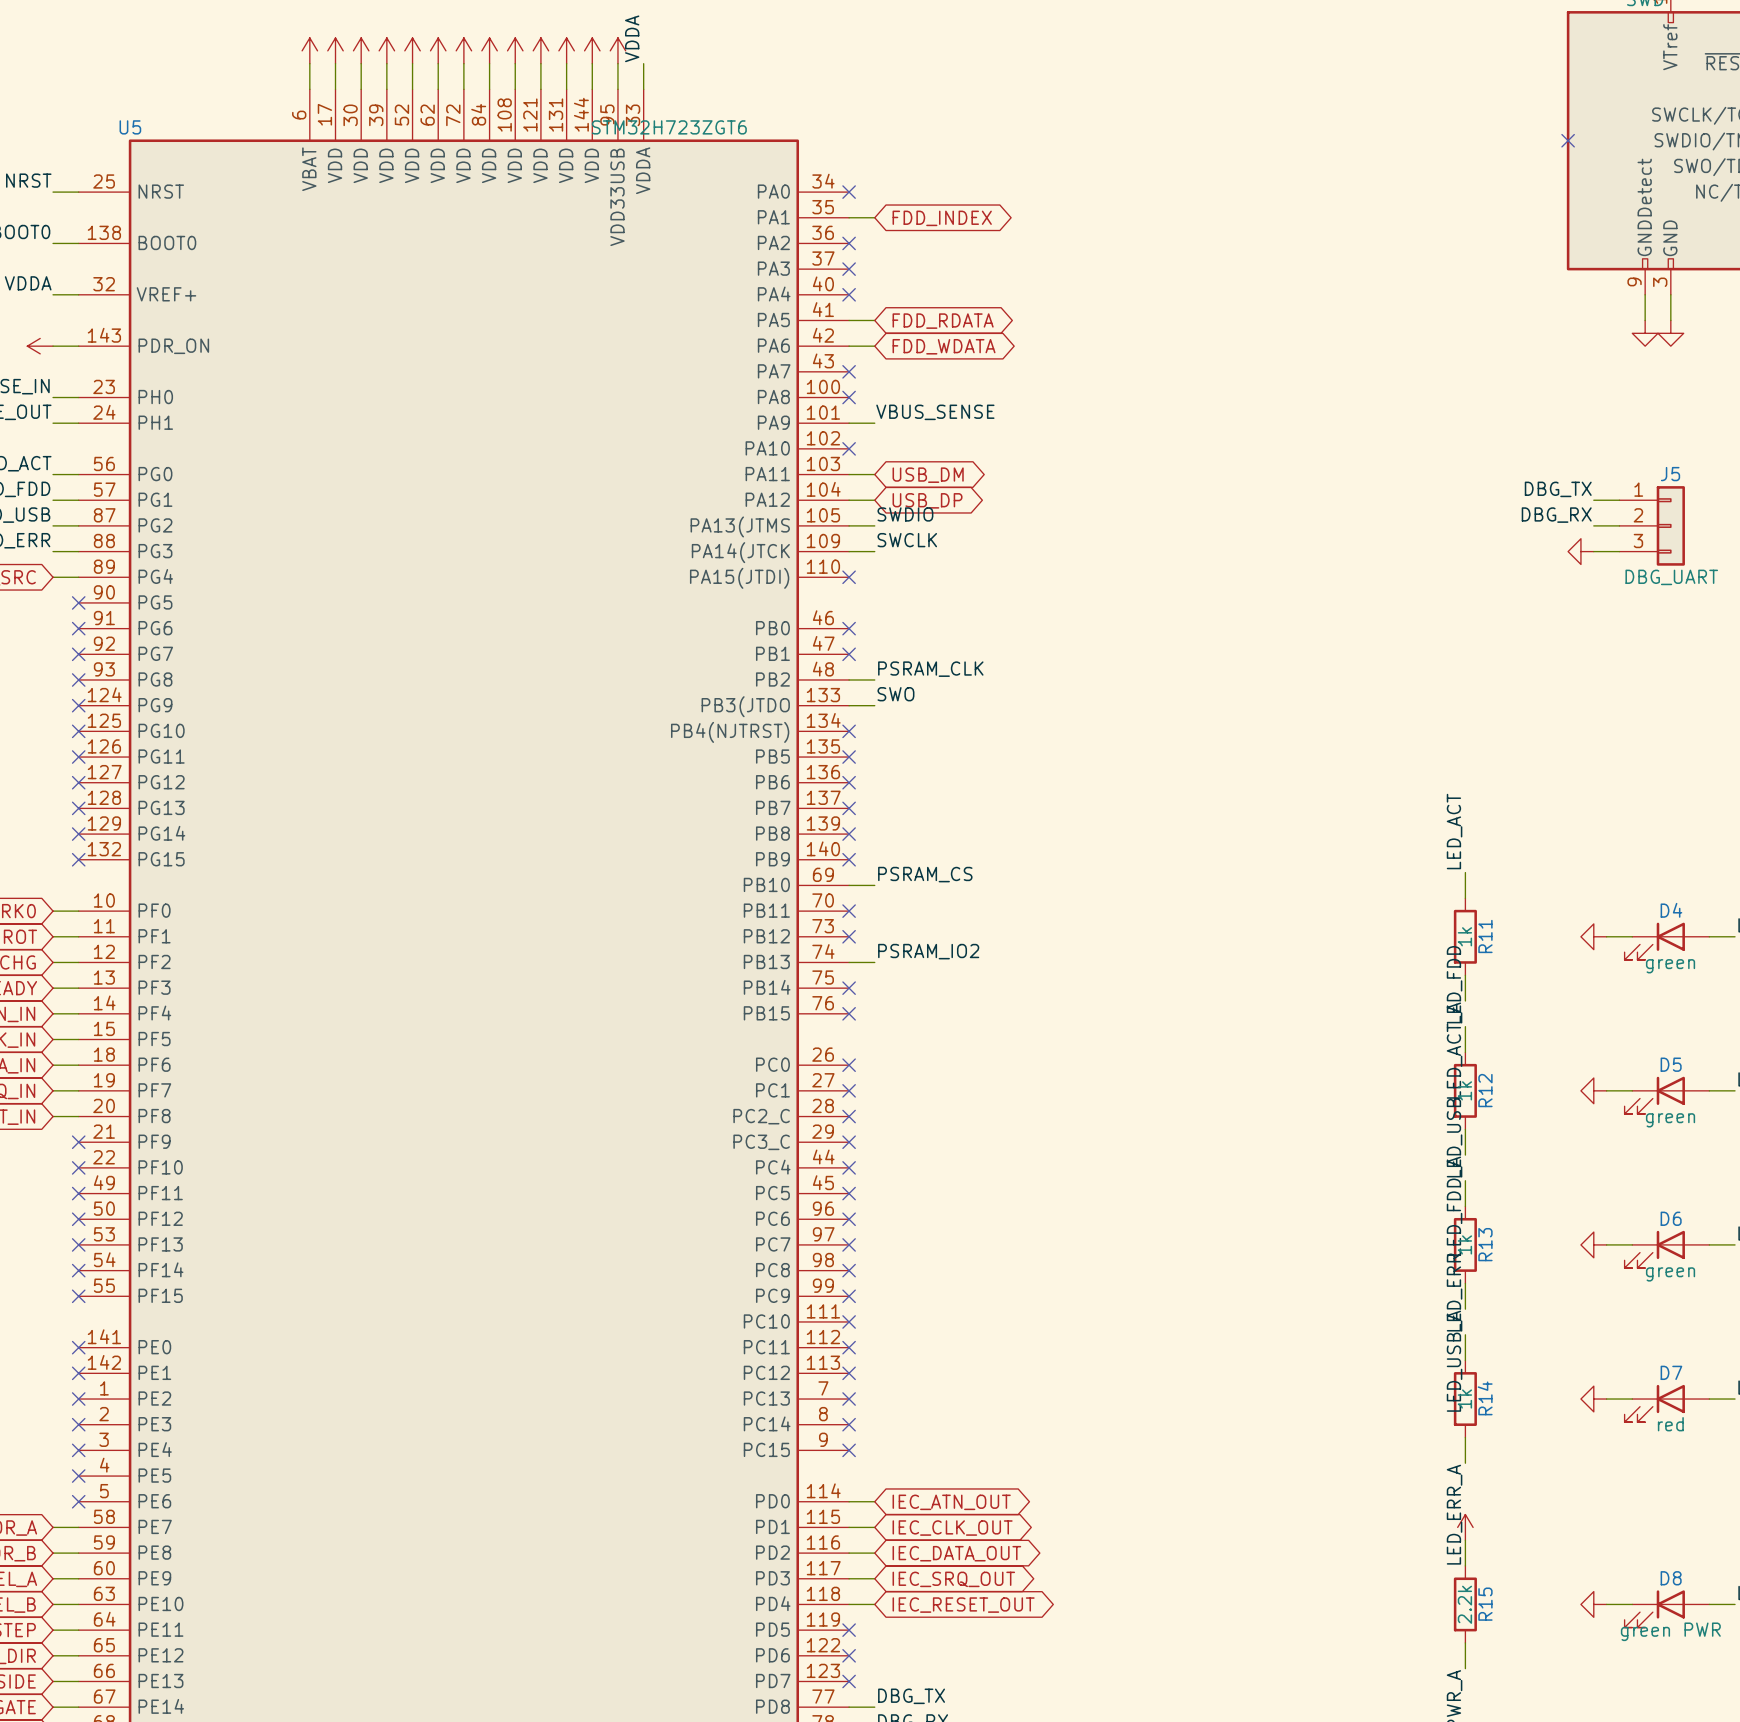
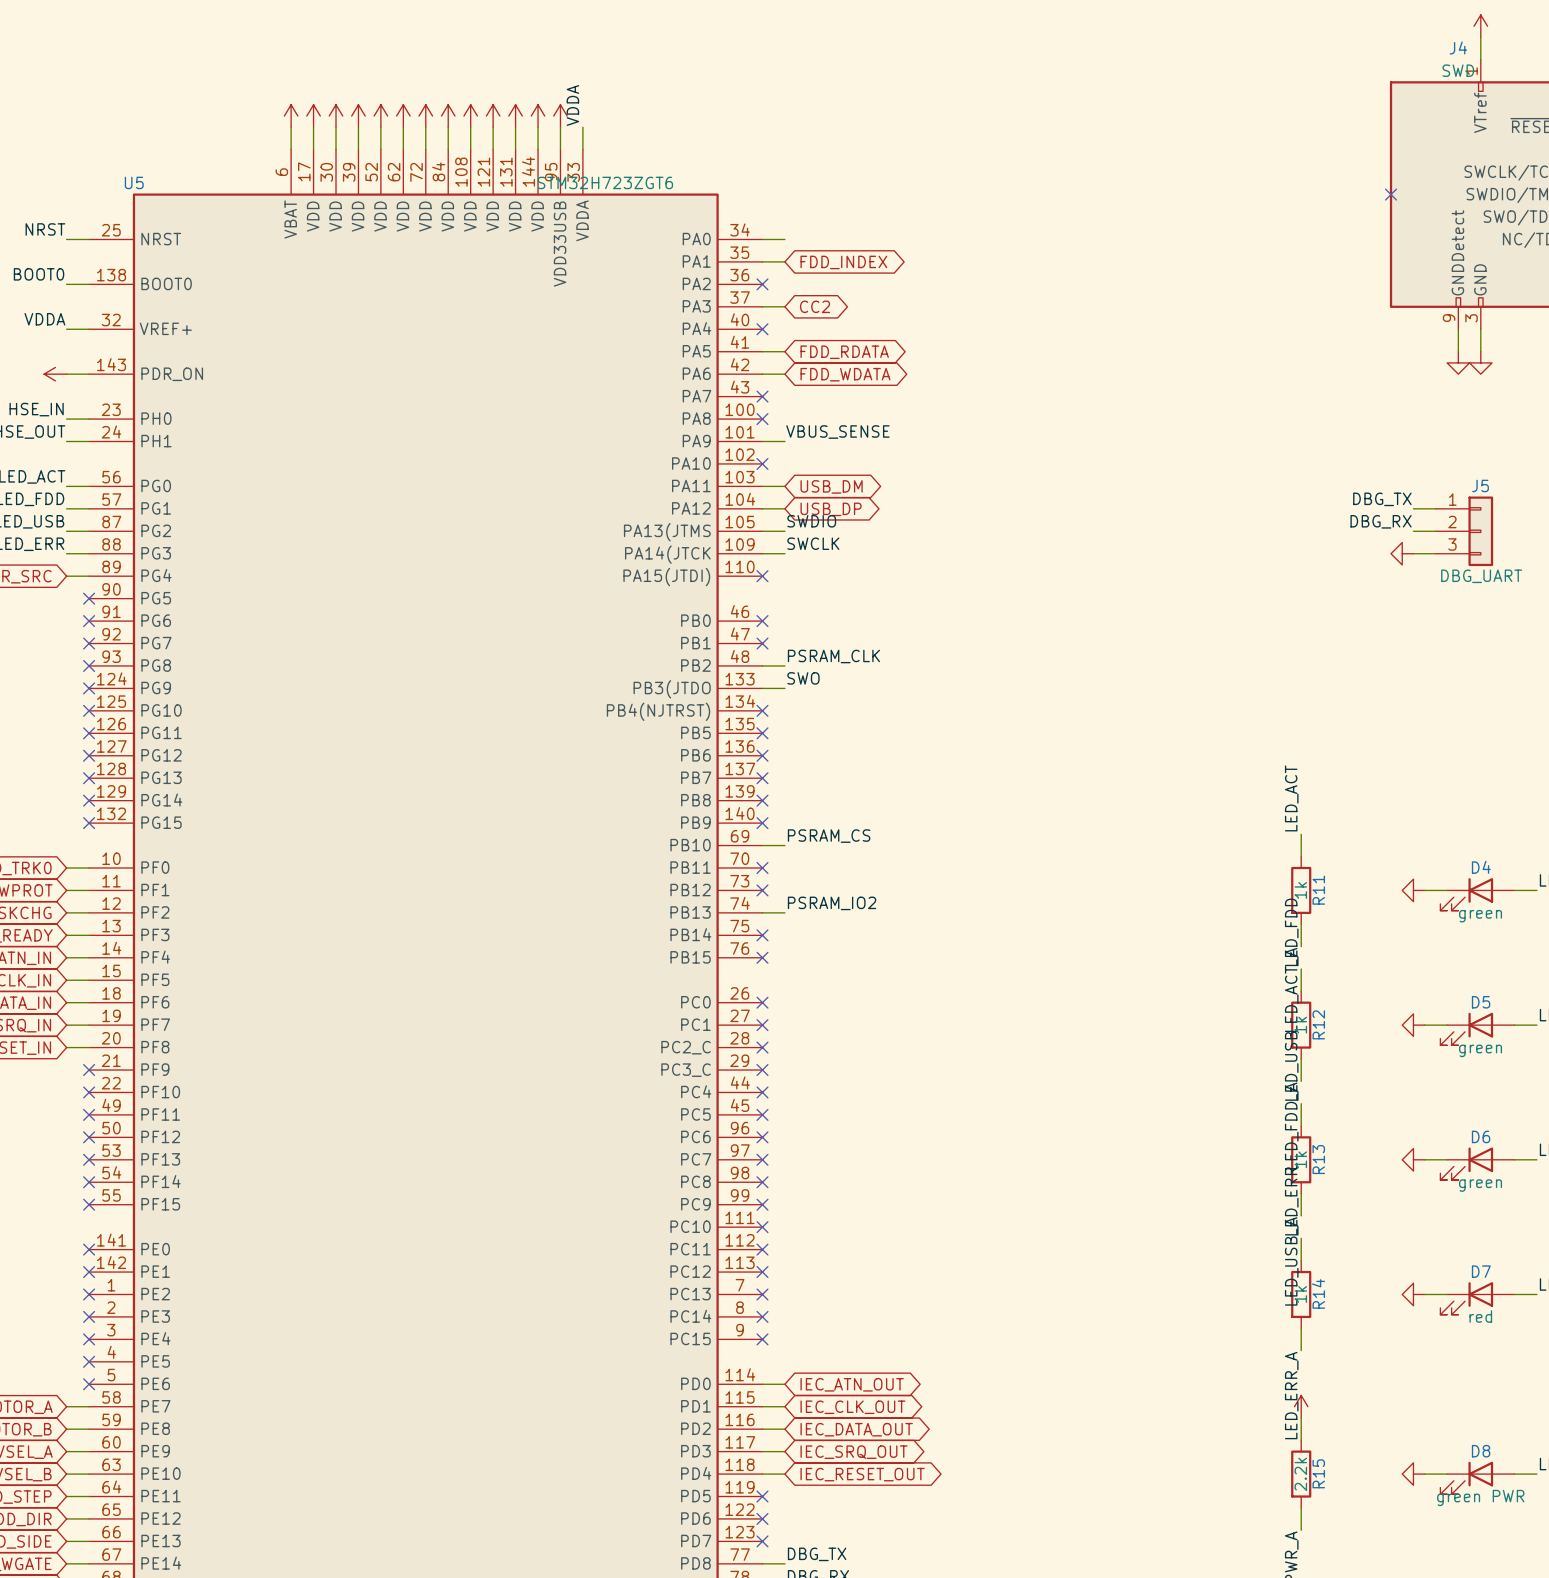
wire: none -> (762, 239) (784, 239)
no-connect mark: (849, 192) -> none
wire: none -> (762, 306) (784, 306)
no-connect mark: (849, 269) -> none
global label: none -> CC2 (815, 306)

